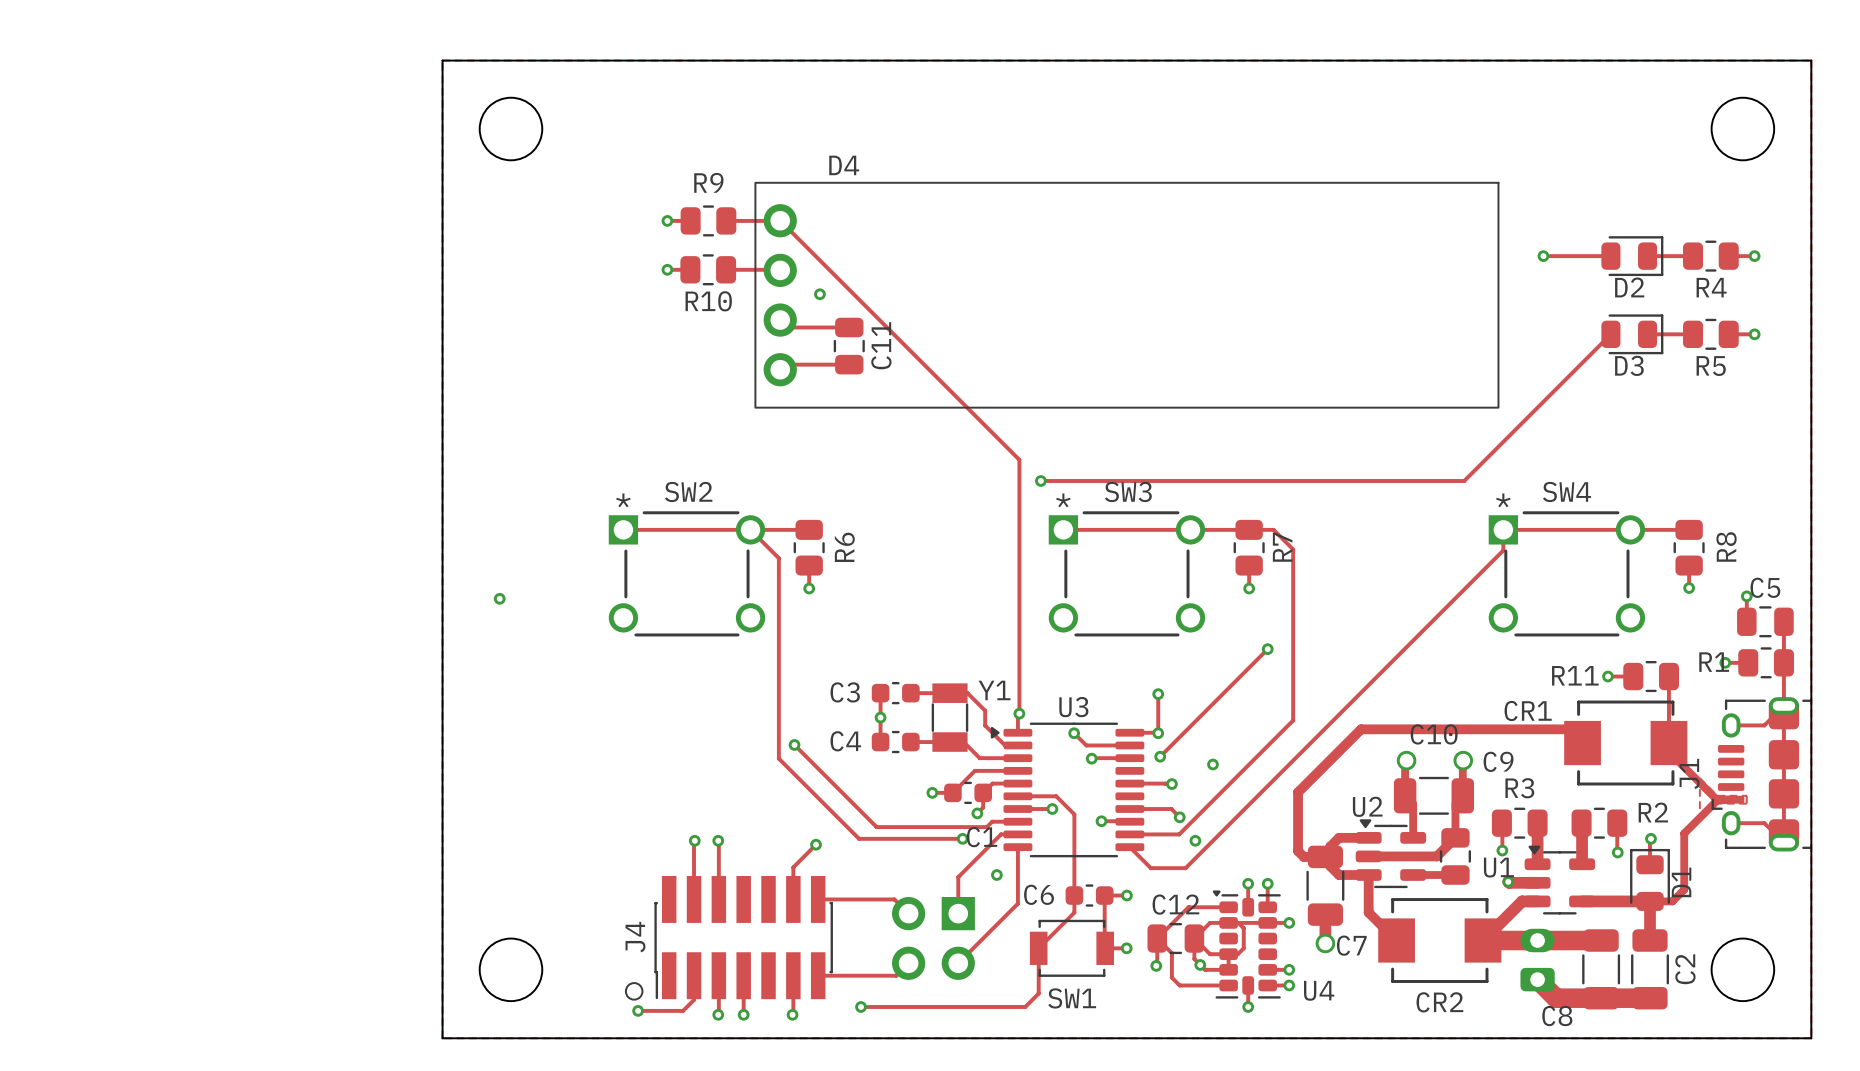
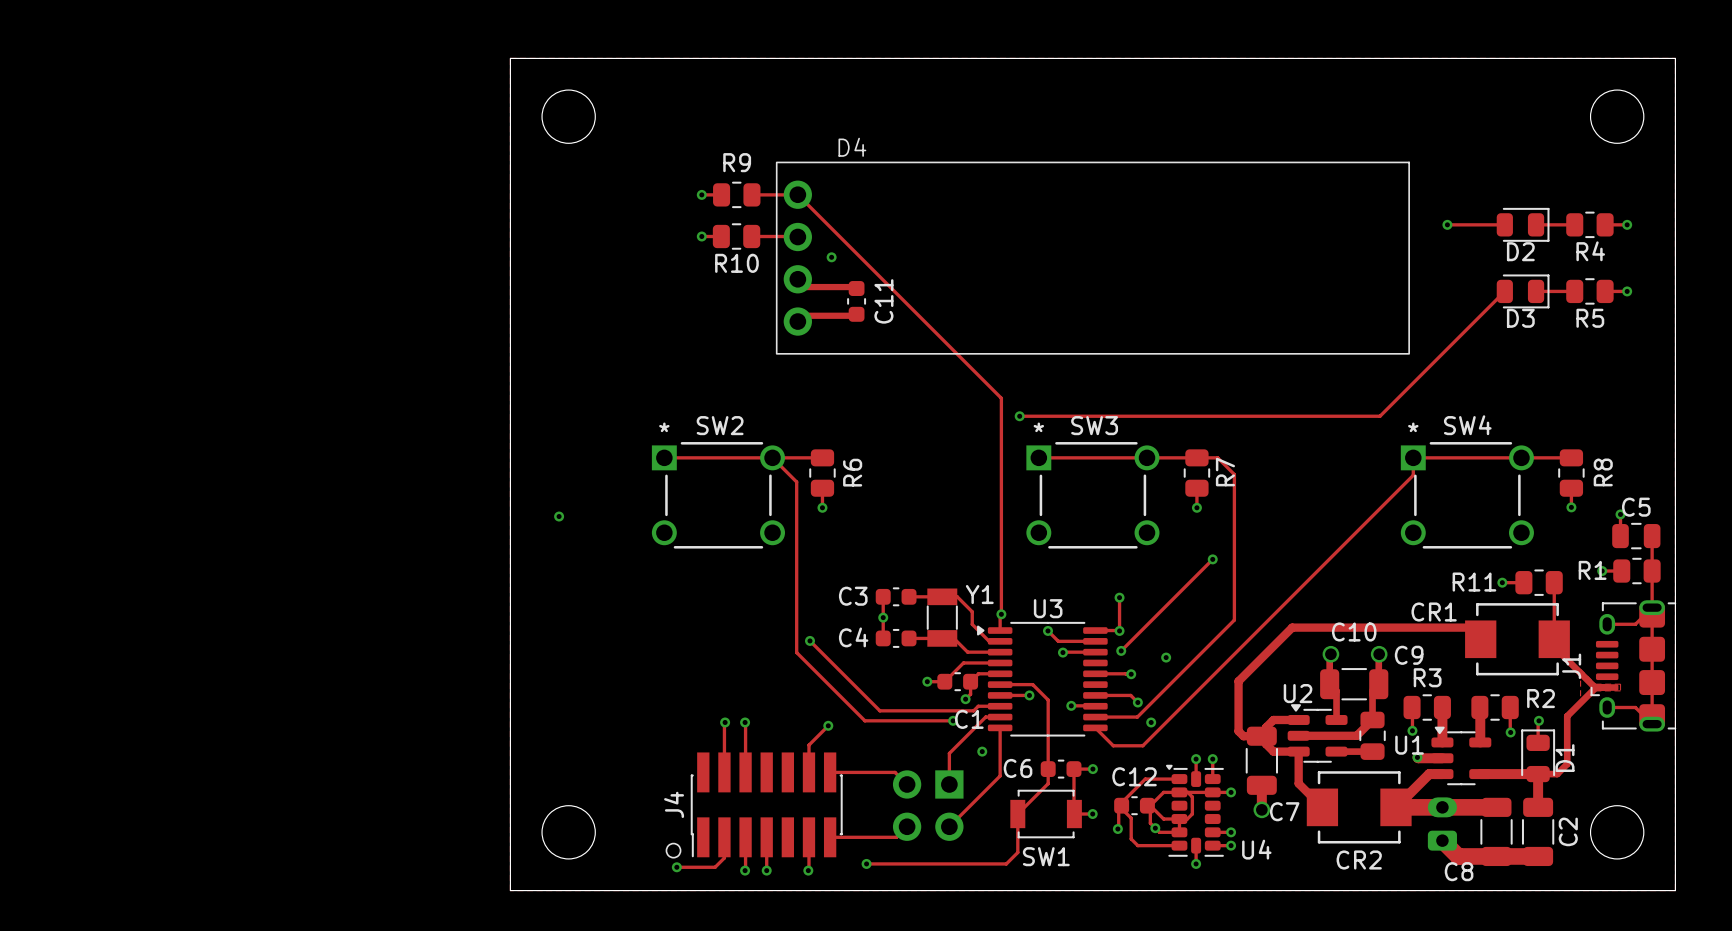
C11 footprint: [833, 317, 865, 375] -> [847, 281, 867, 322]
track: none -> (797, 279) (807, 288) (856, 288)
track: none -> (856, 314) (805, 314) (797, 321)
C12 footprint: [1147, 923, 1205, 955] -> [1114, 796, 1155, 816]

